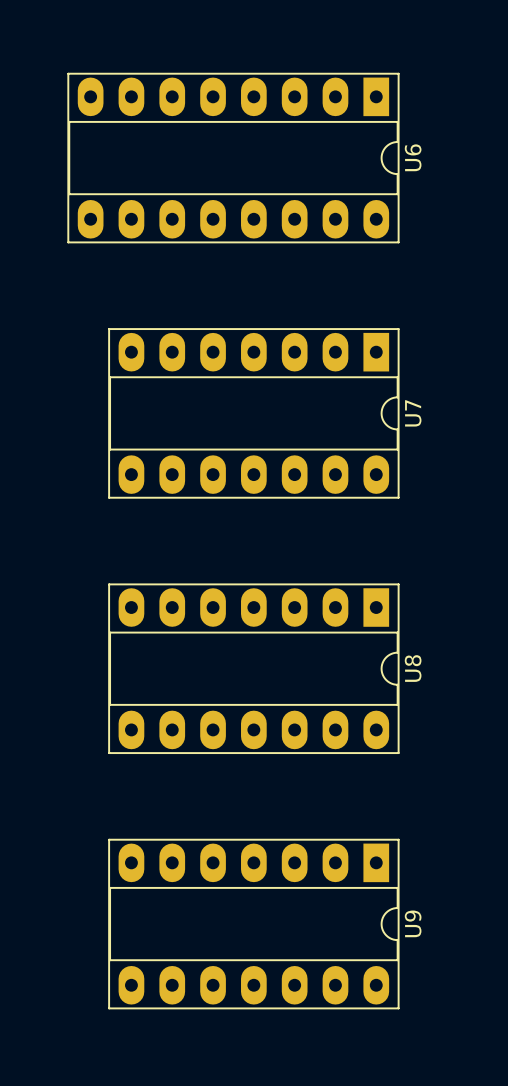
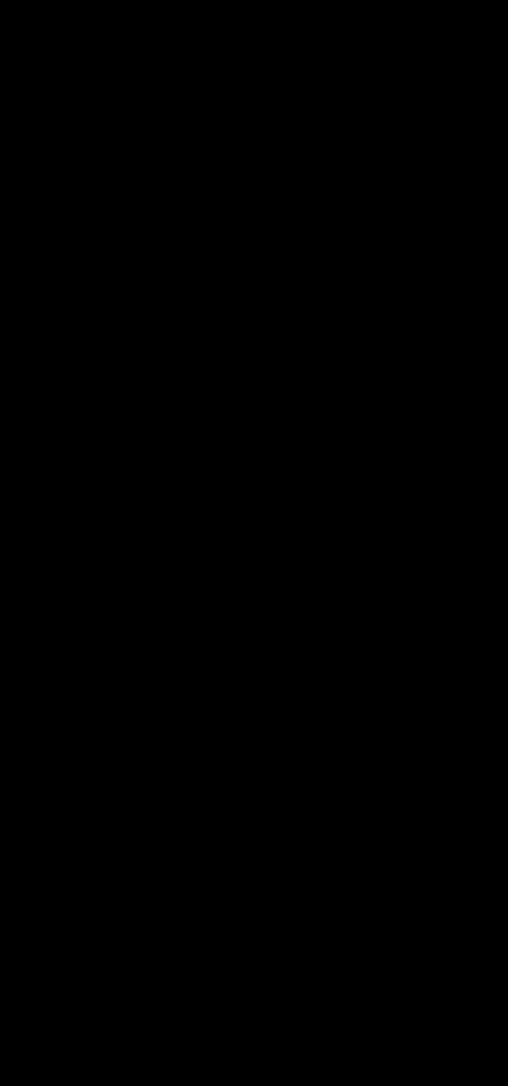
U6: (233, 158) -> none
U7: (253, 413) -> none
U8: (253, 668) -> none
U9: (253, 924) -> none

